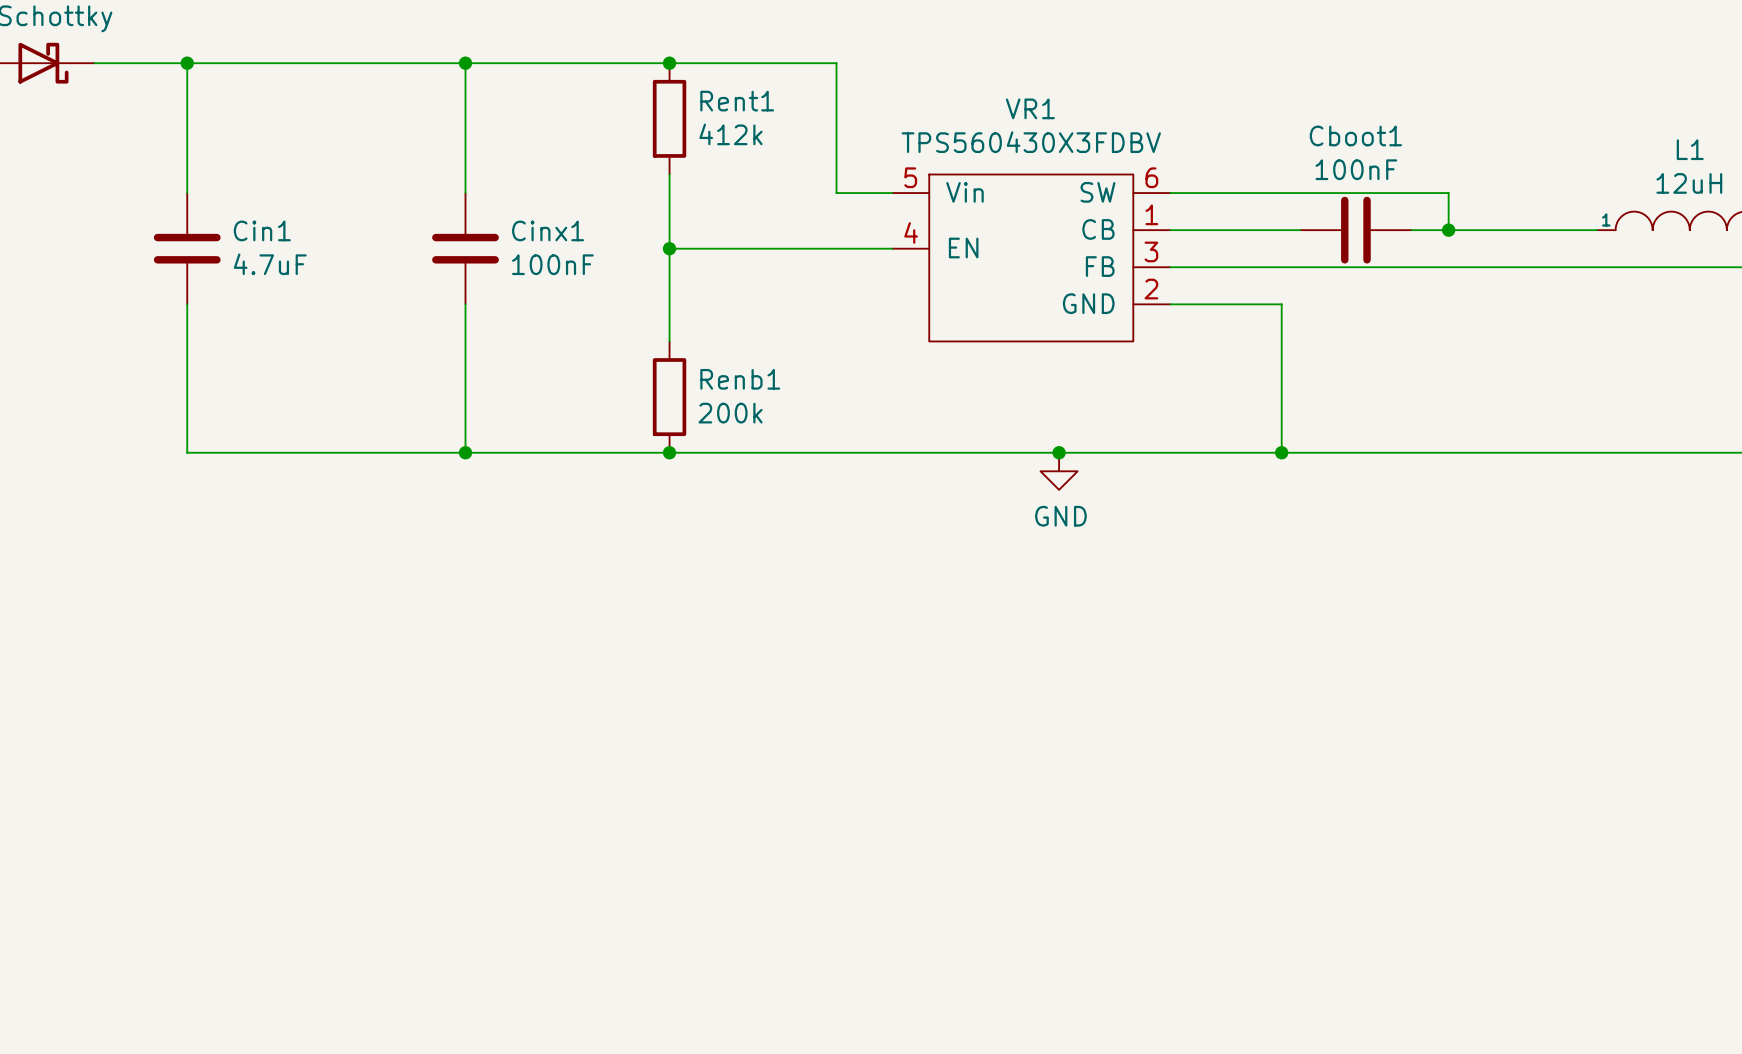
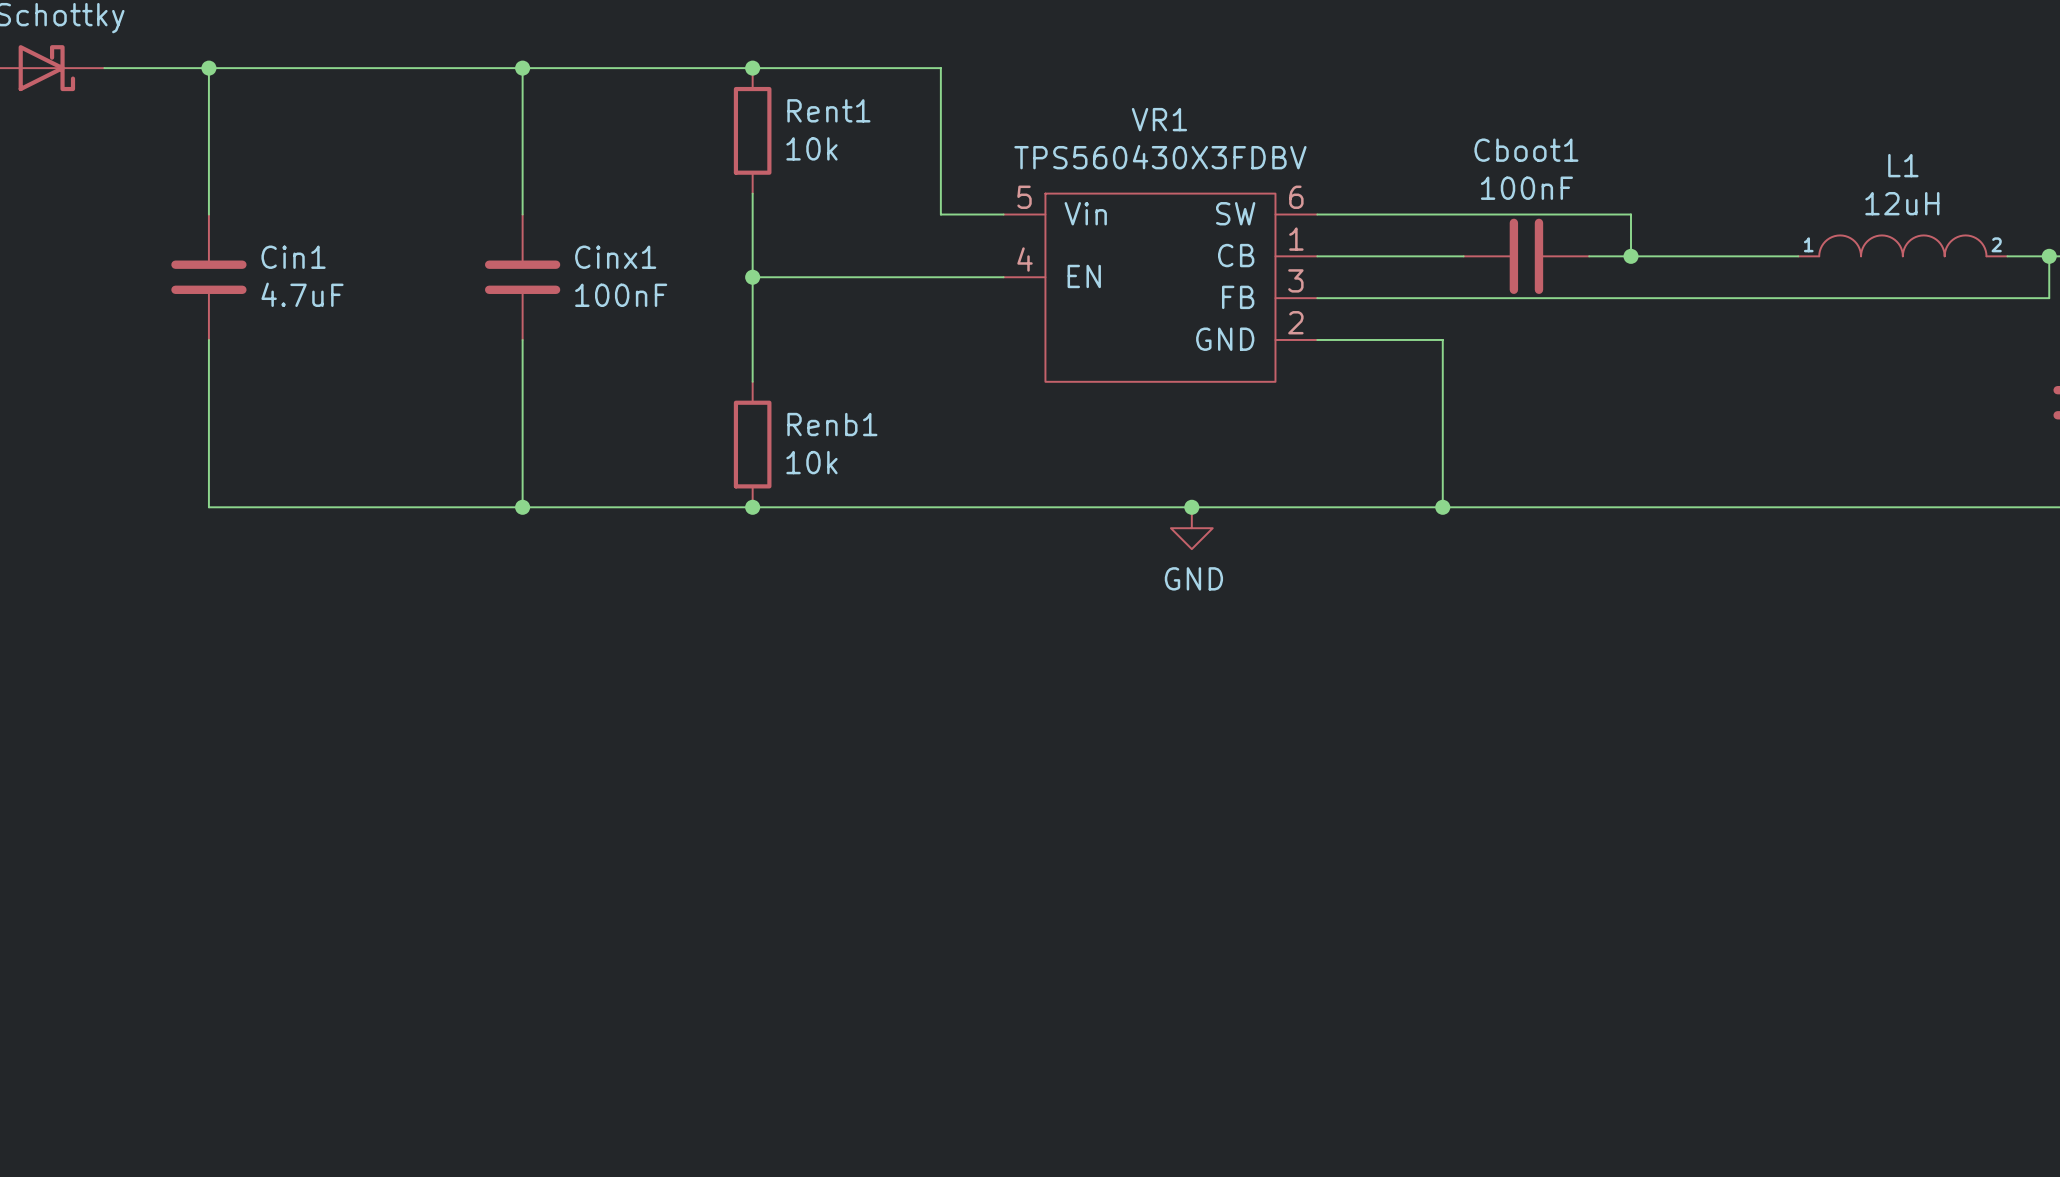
Rent1 value: 412k (730, 134) -> 10k (811, 148)
Renb1 value: 200k (730, 413) -> 10k (811, 462)

